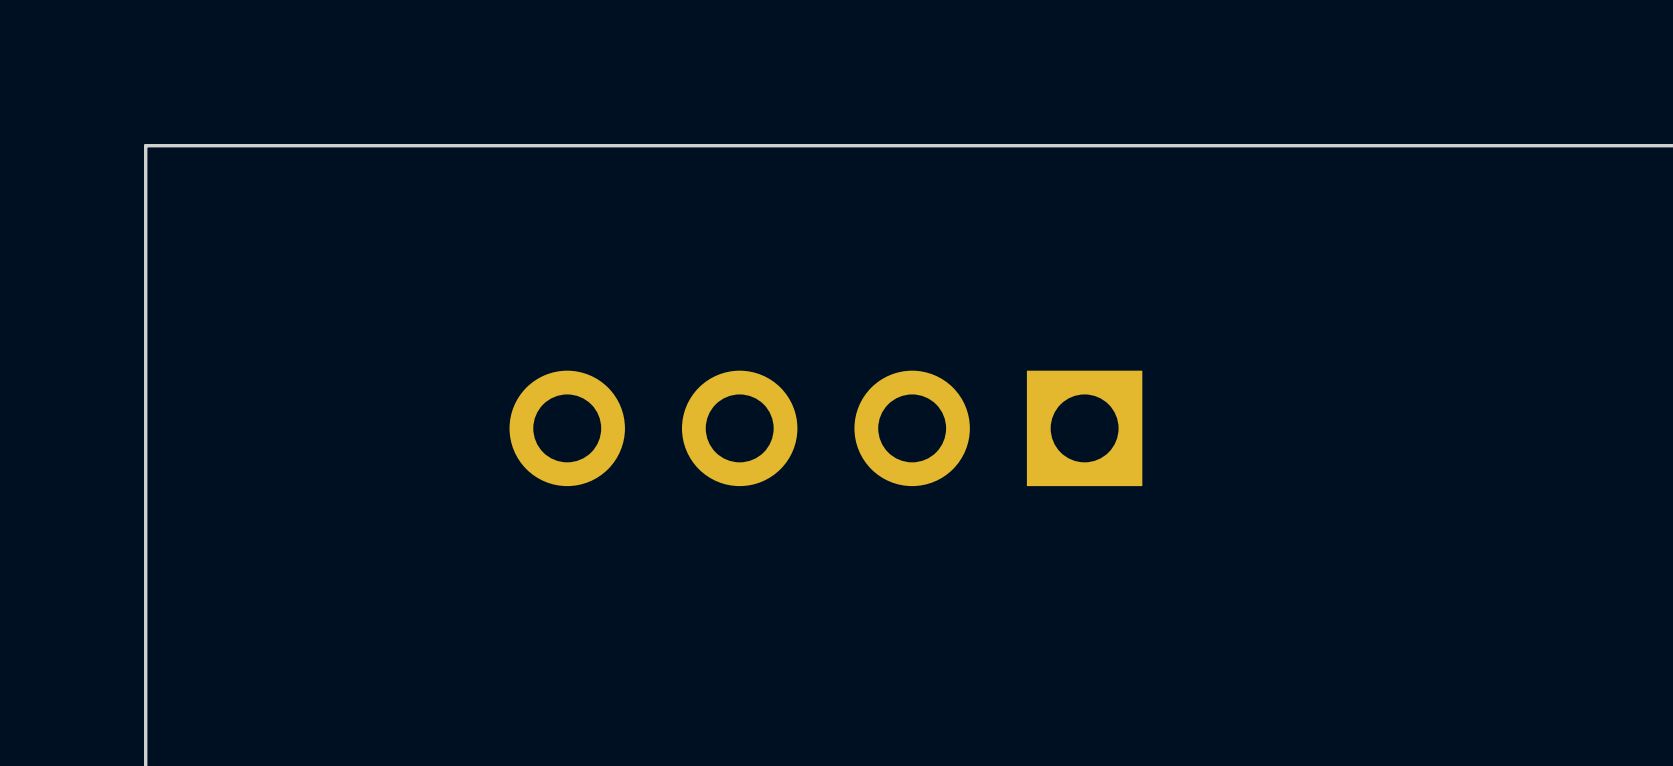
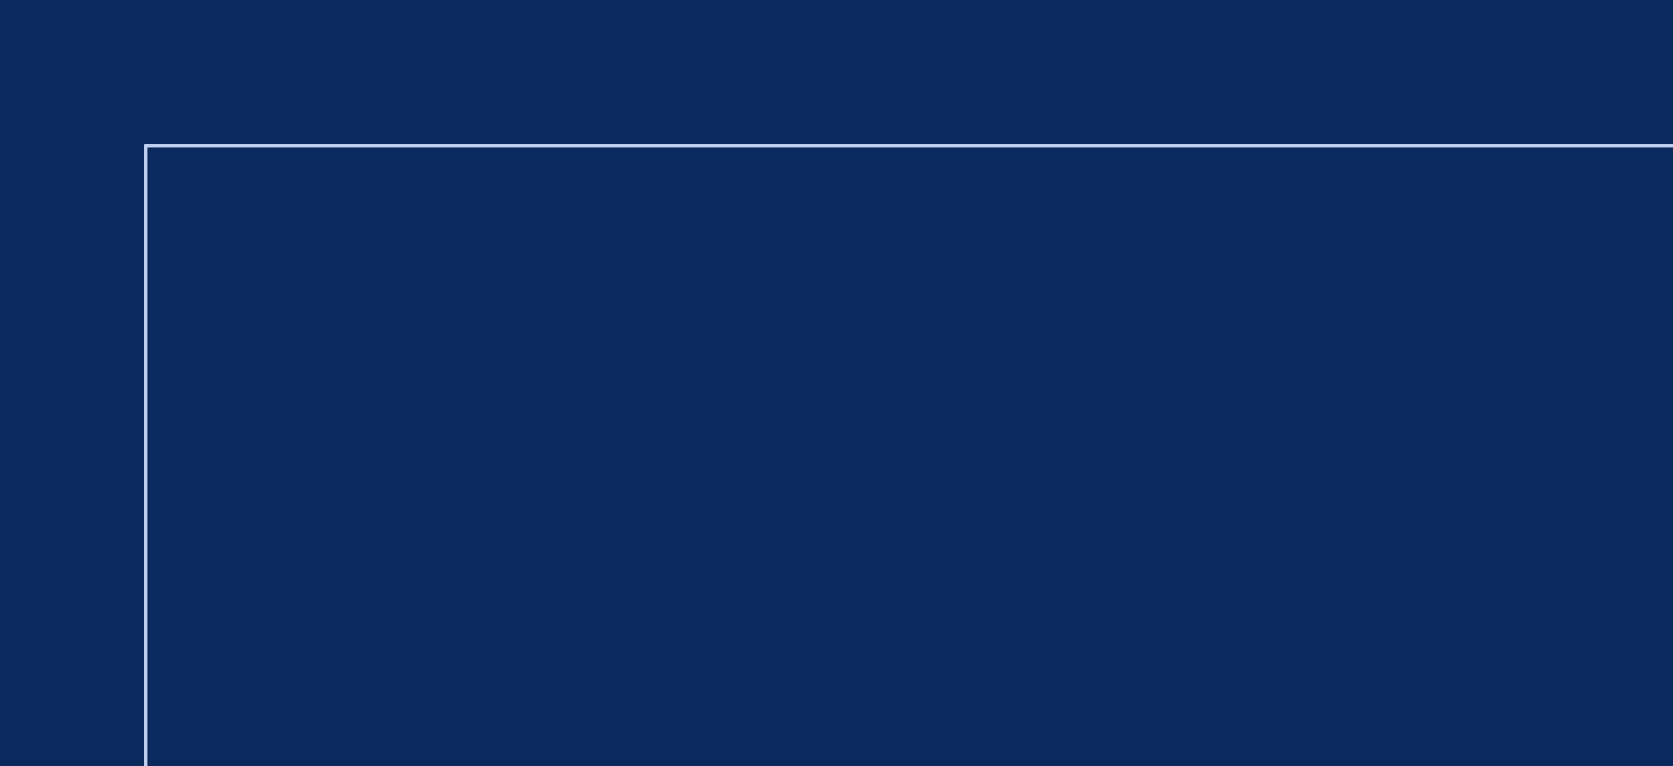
part: (825, 428) -> none

